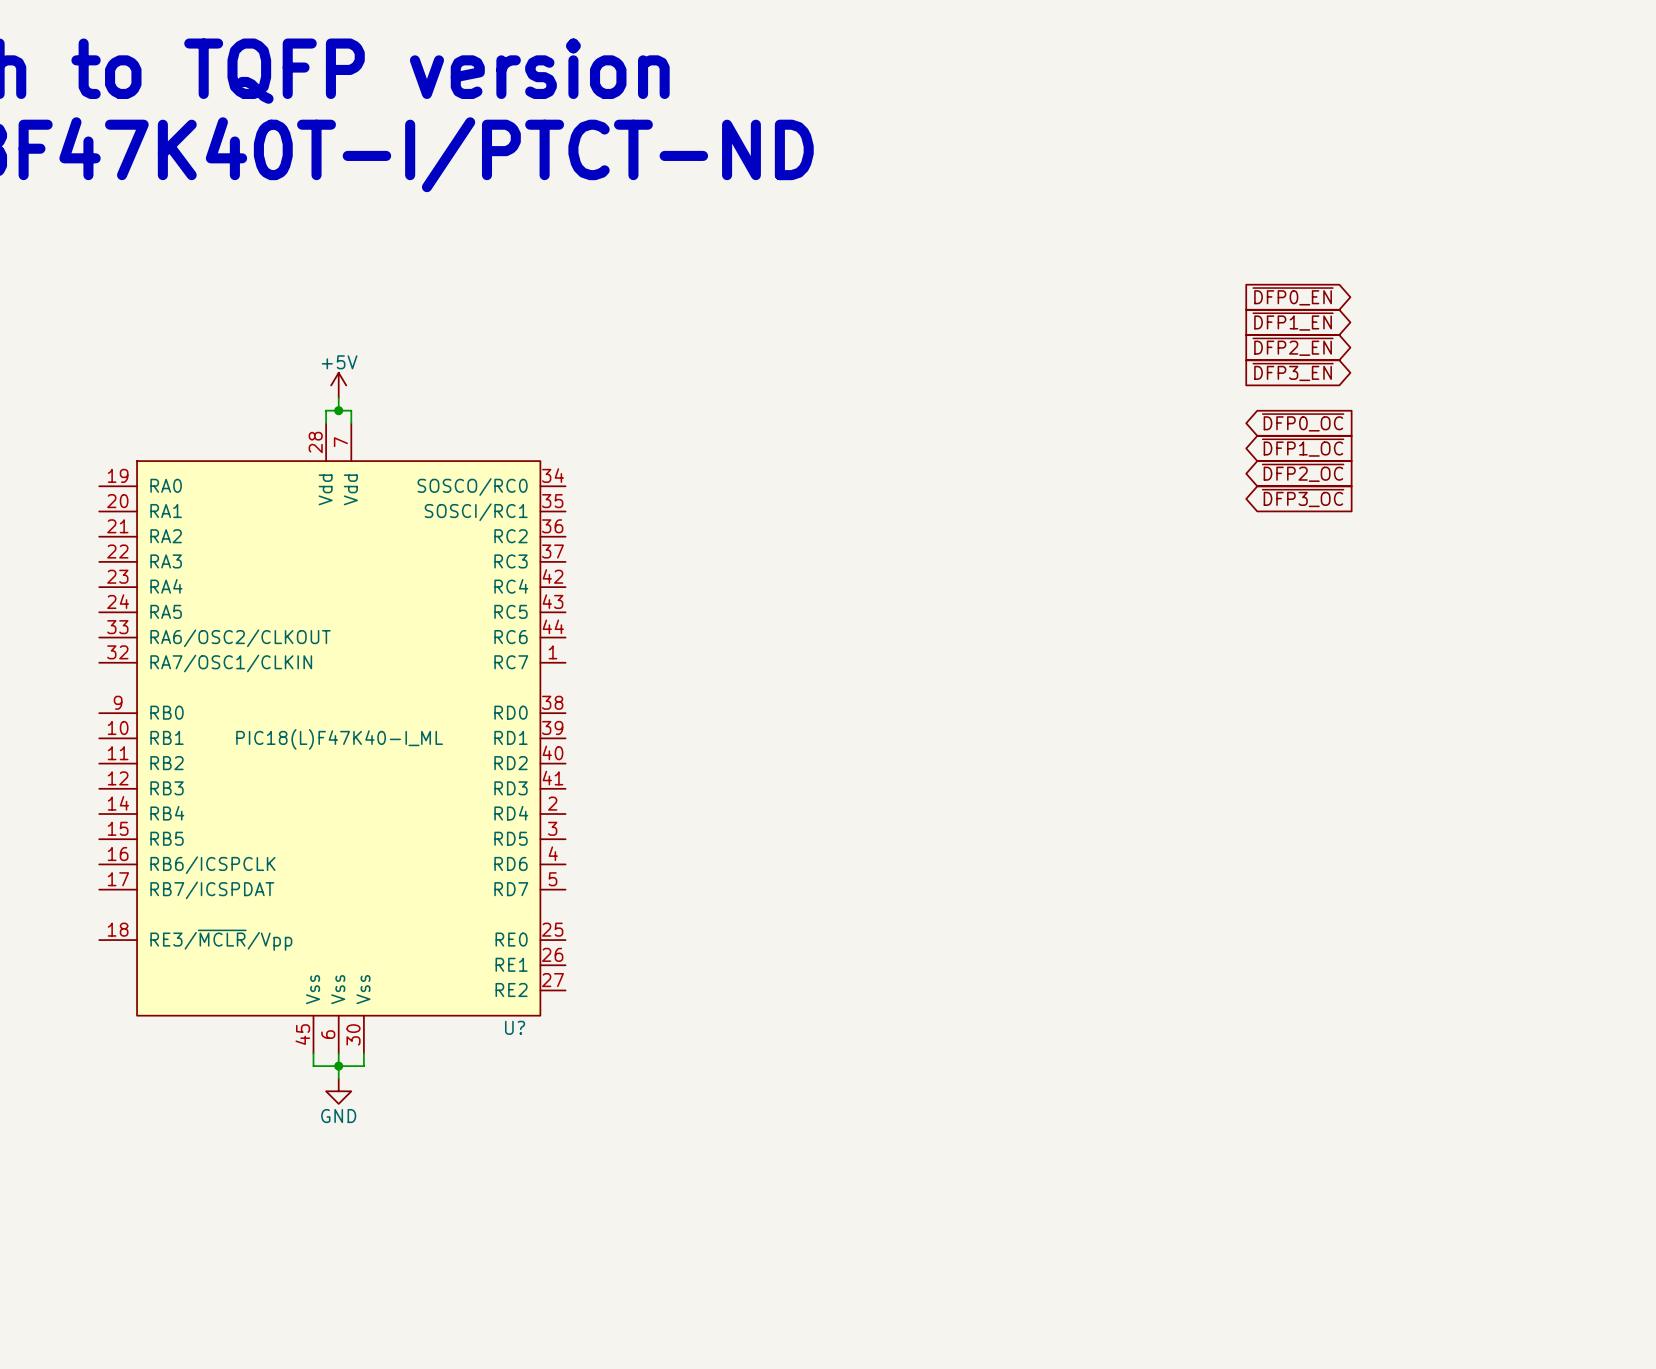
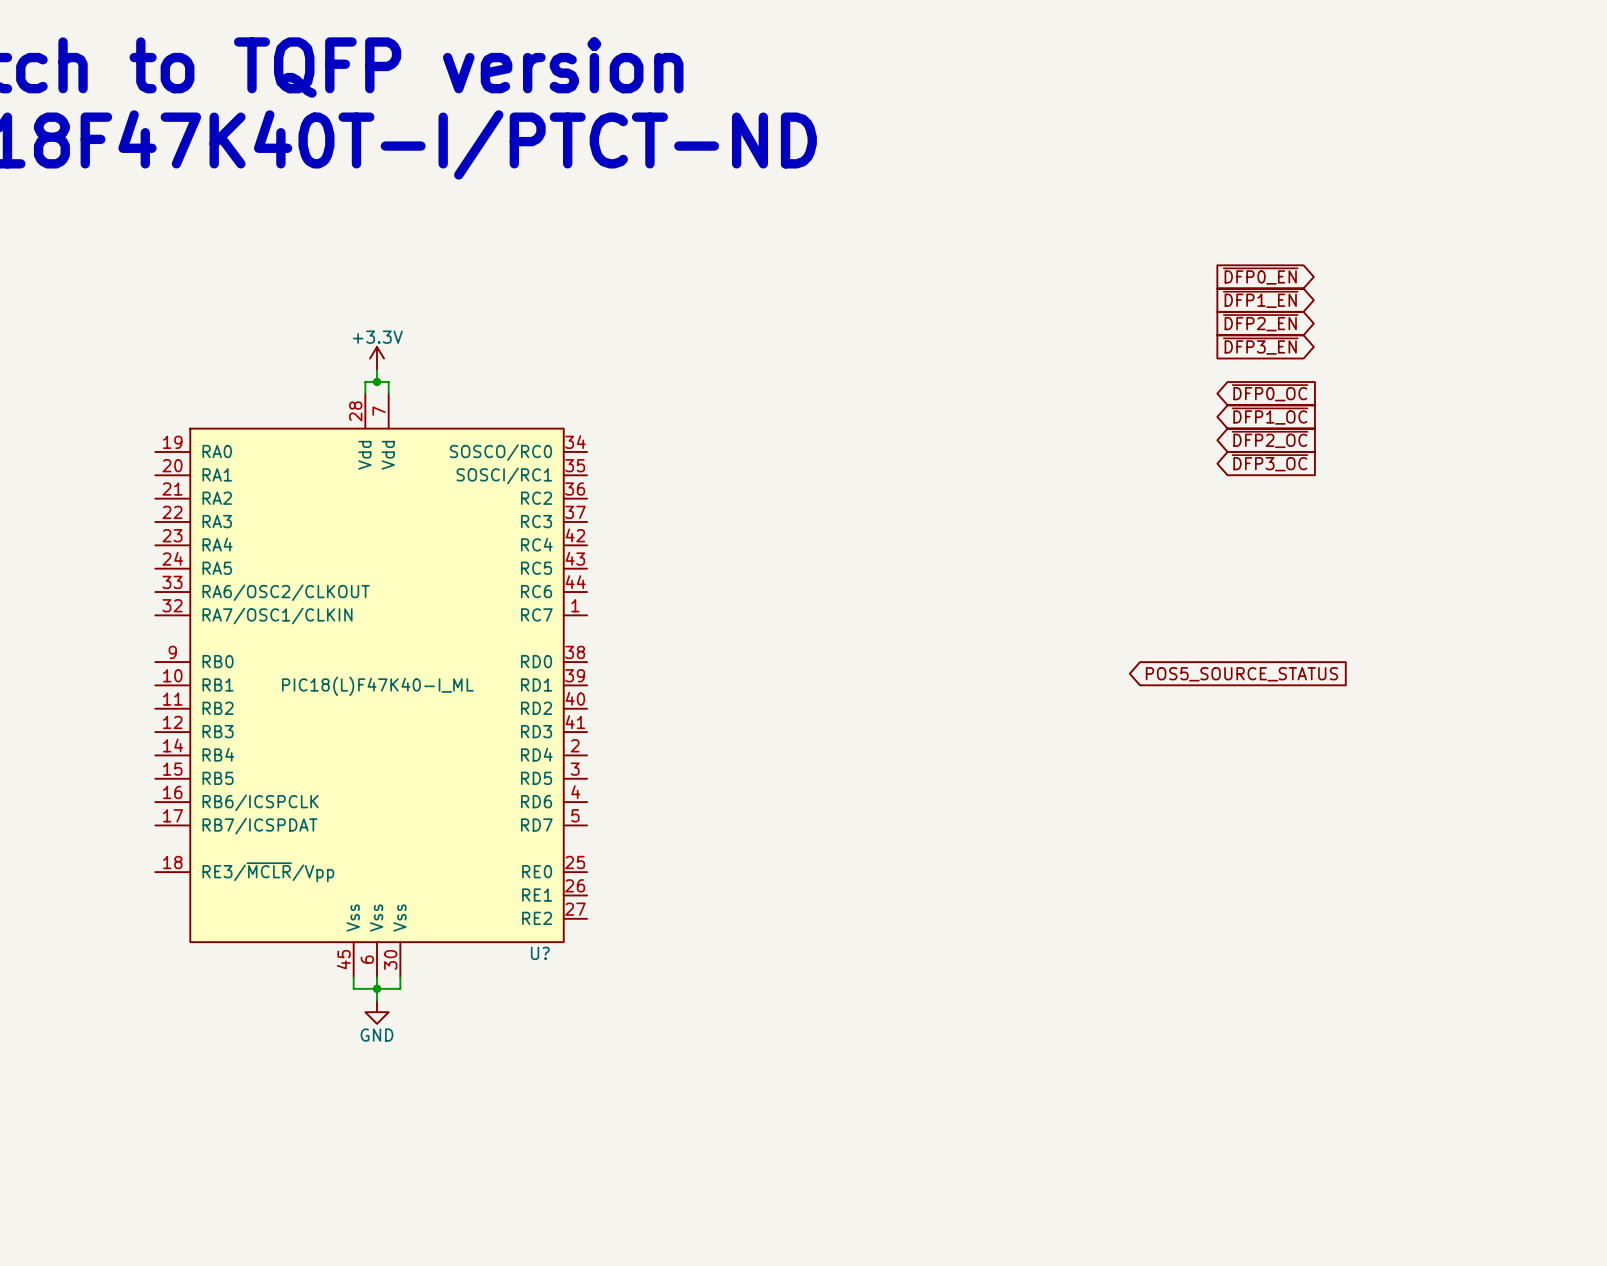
power symbol: +5V (338, 385) -> +3.3V (377, 358)
global label: none -> POS5_SOURCE_STATUS (1241, 674)

